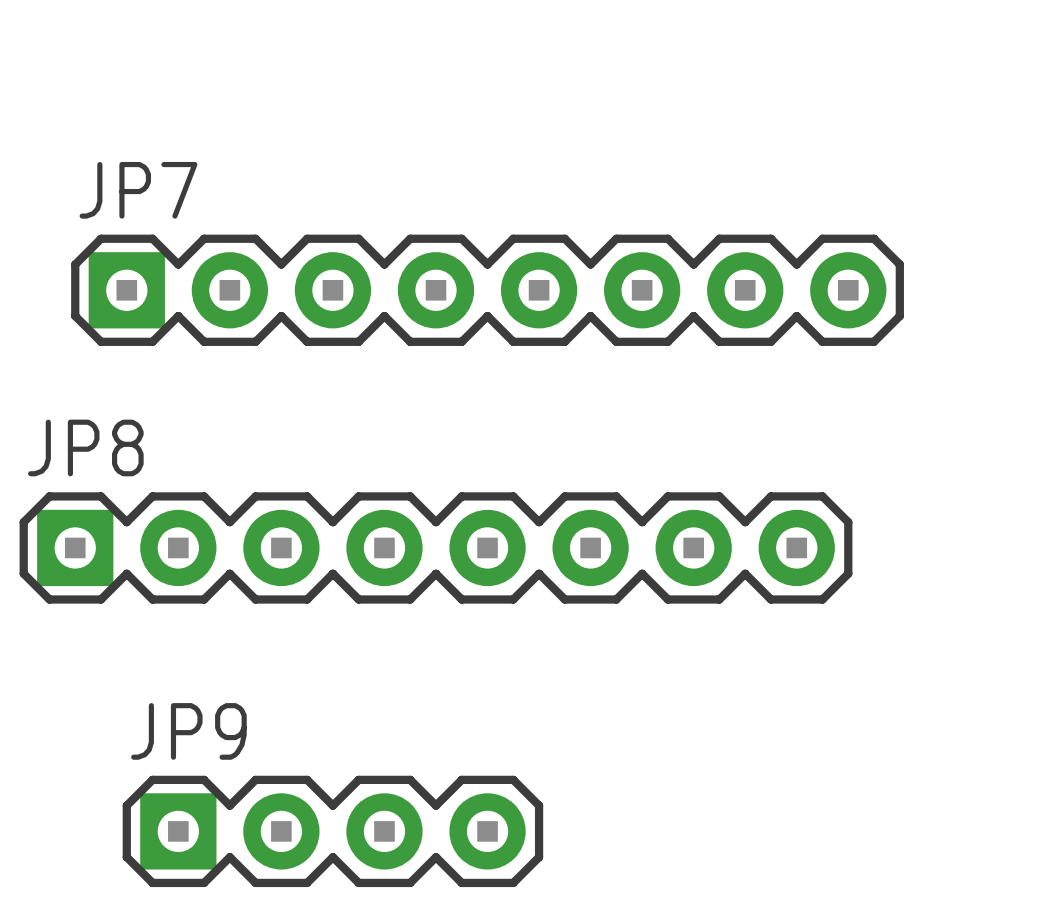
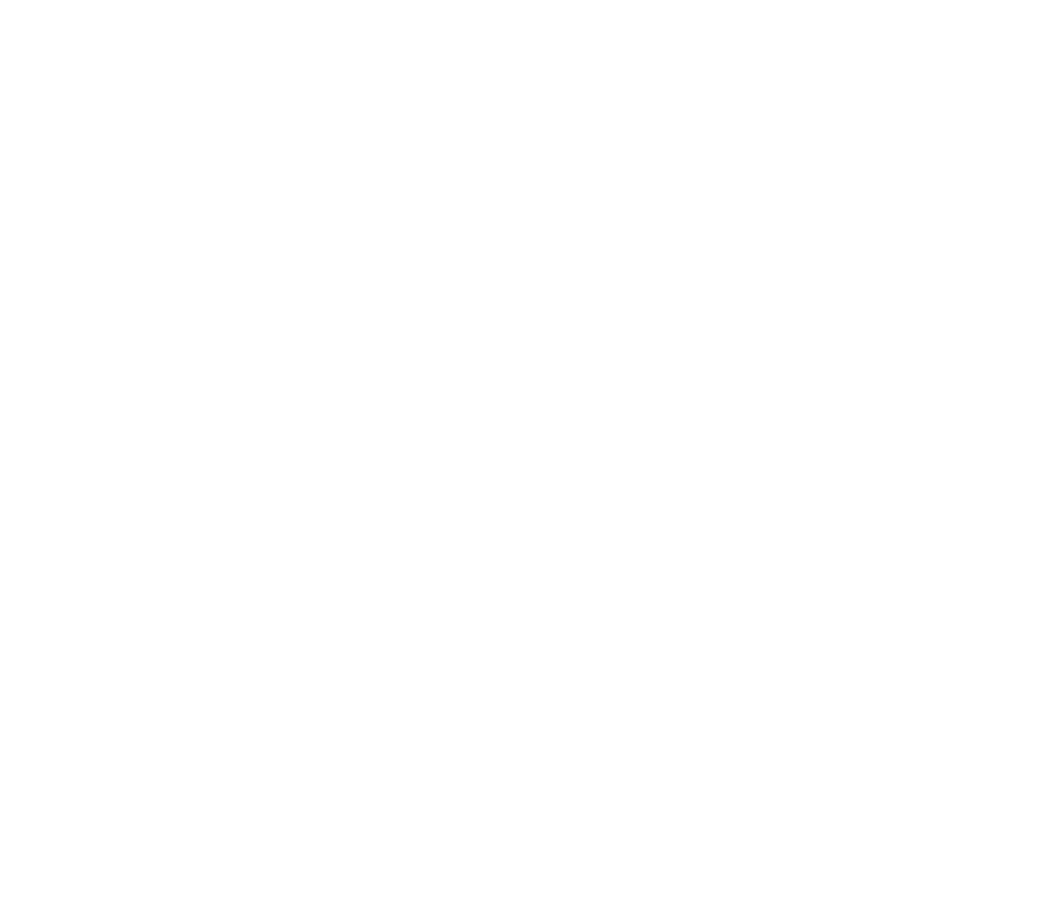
JP7: (487, 290) -> none
JP8: (436, 547) -> none
JP9: (332, 831) -> none

